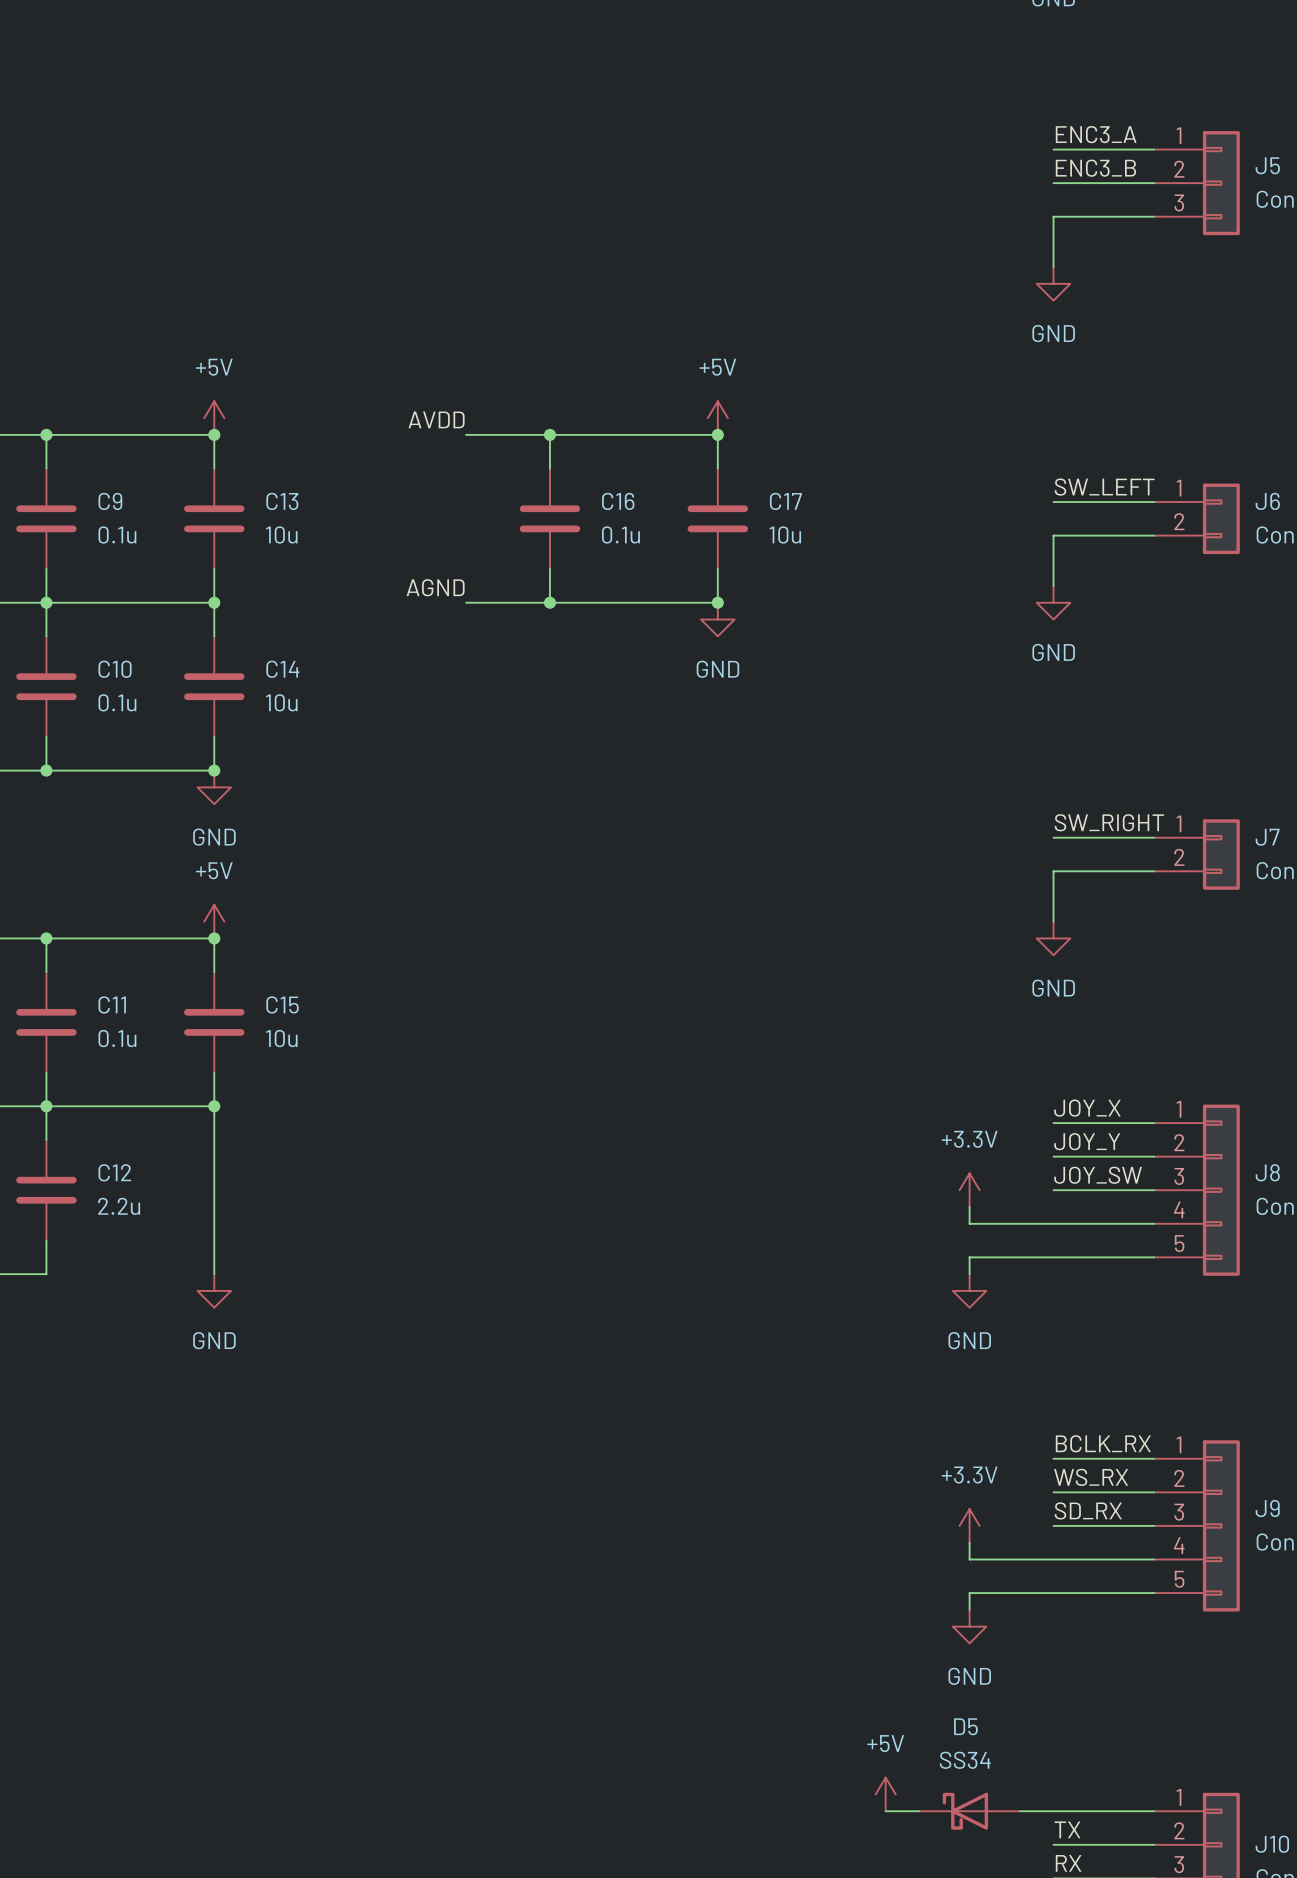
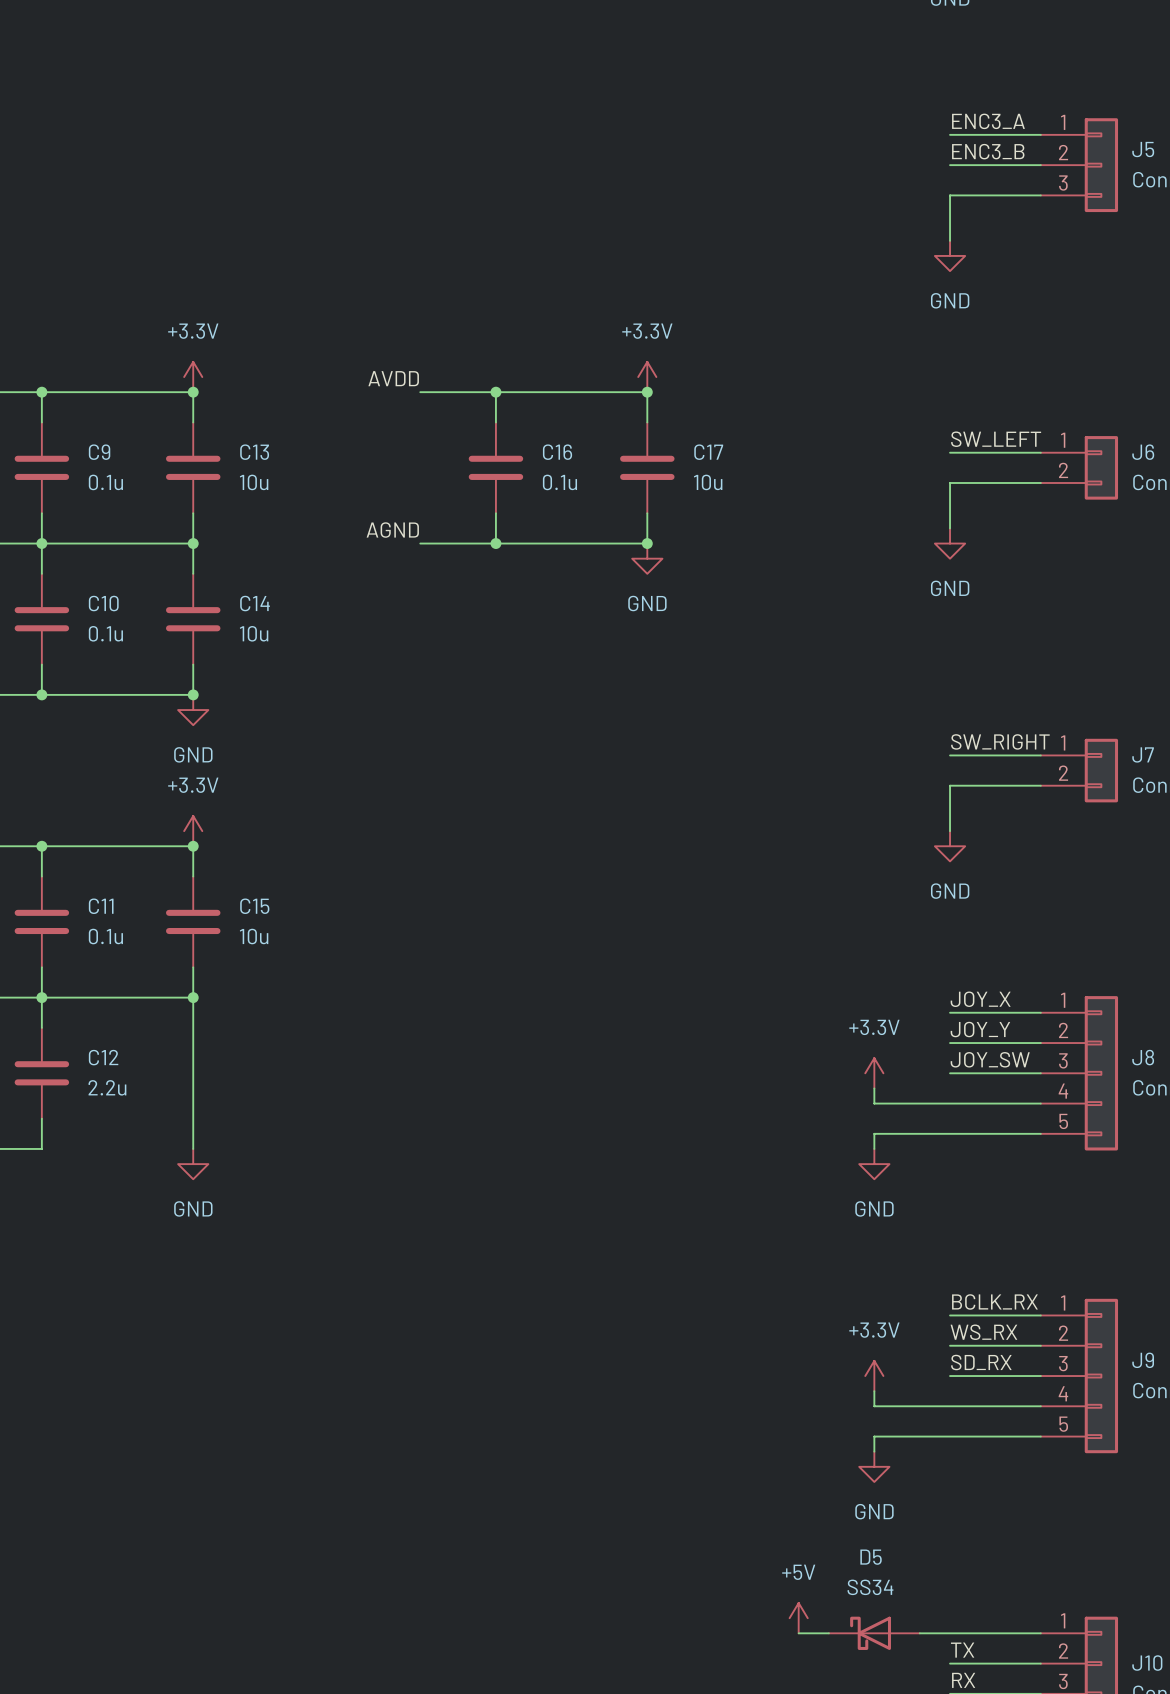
power symbol: +5V (214, 418) -> +3.3V (193, 377)
power symbol: +5V (717, 418) -> +3.3V (647, 377)
power symbol: +5V (214, 921) -> +3.3V (193, 831)

